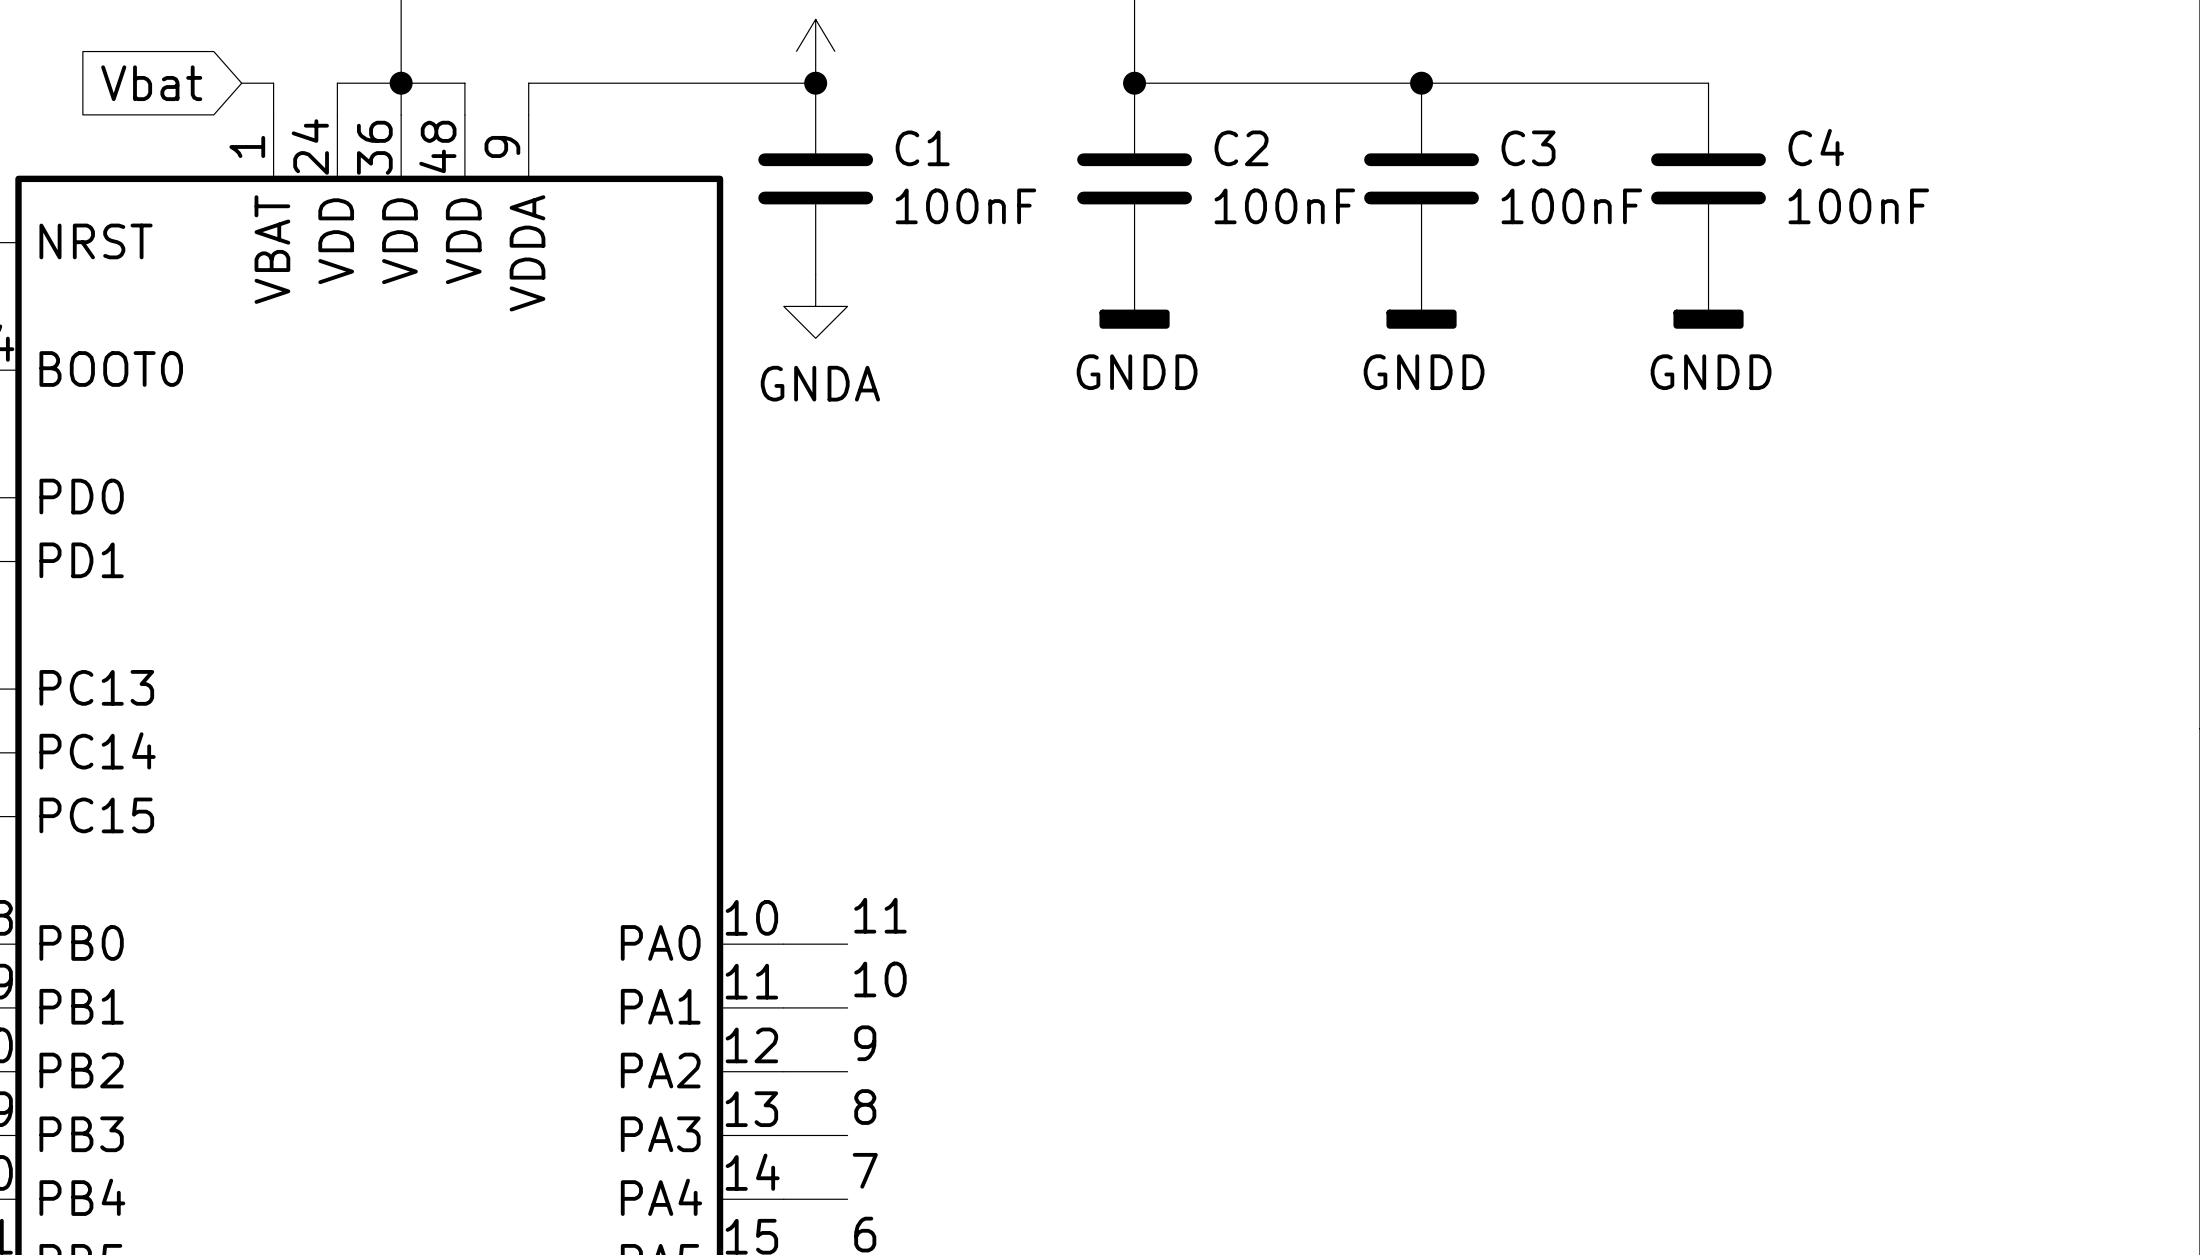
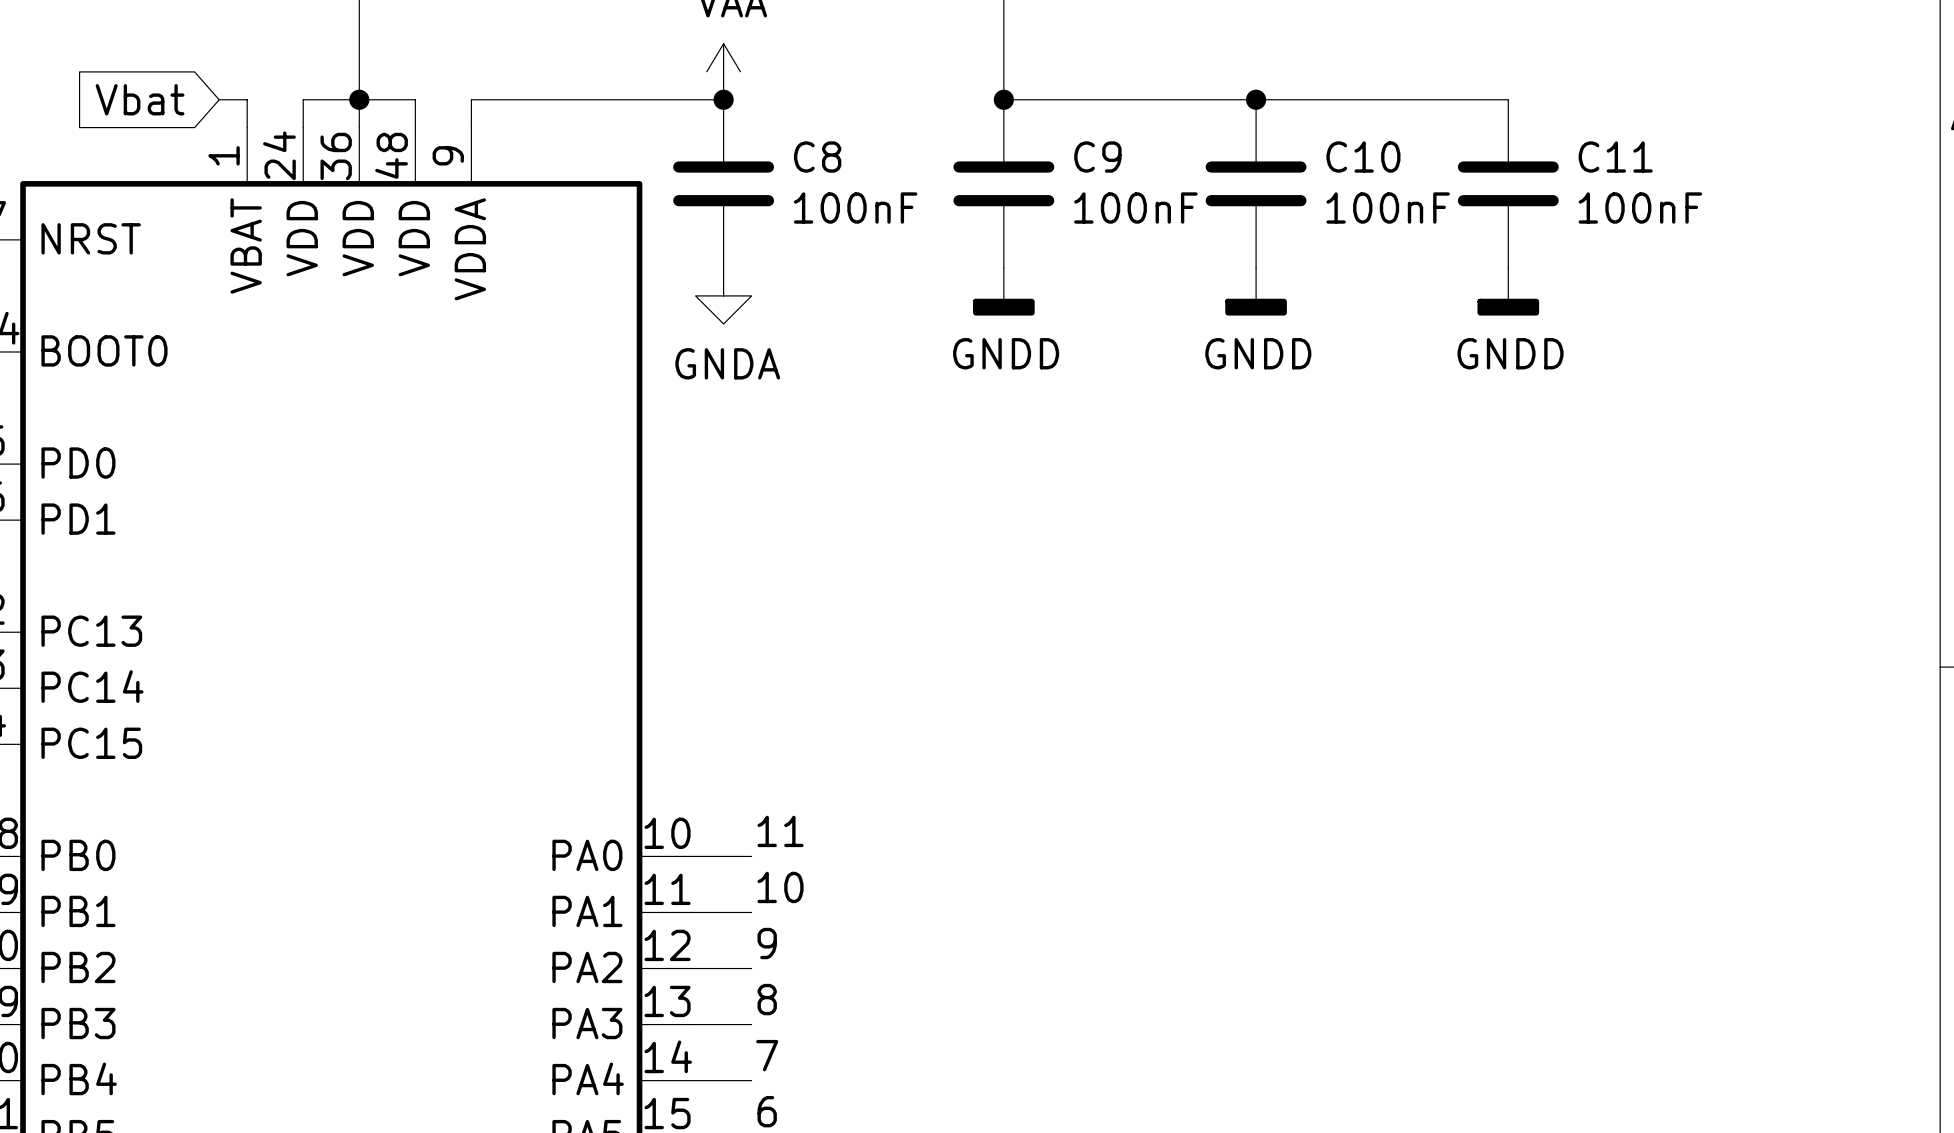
C4 name: C4 (1816, 147) -> C11 (1615, 157)
C1 name: C1 (922, 148) -> C8 (817, 157)
C2 name: C2 (1241, 148) -> C9 (1097, 157)
C3 name: C3 (1528, 148) -> C10 (1363, 157)

